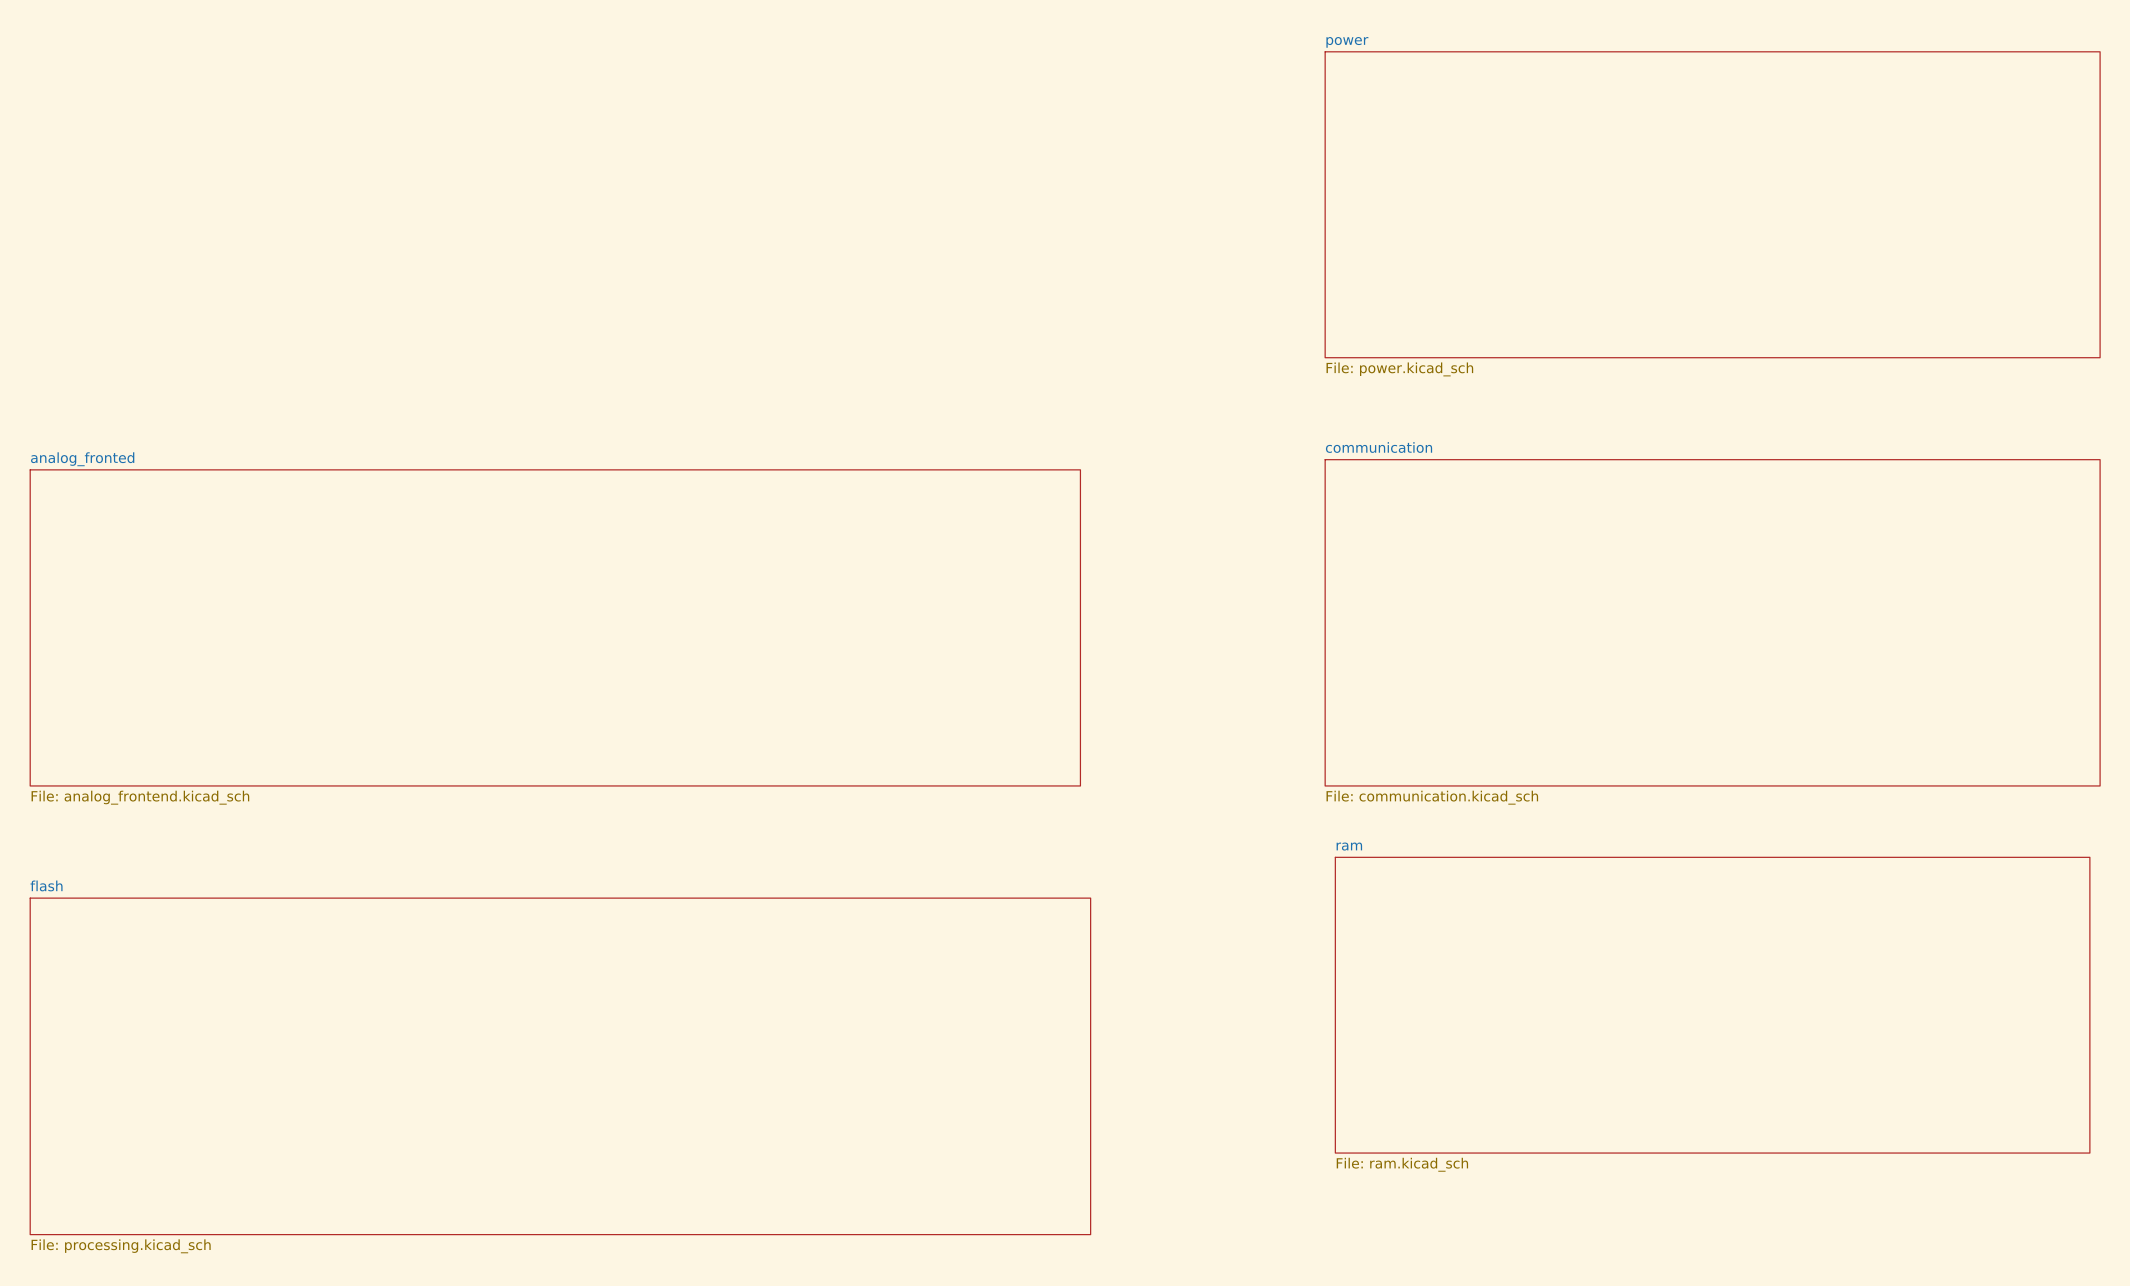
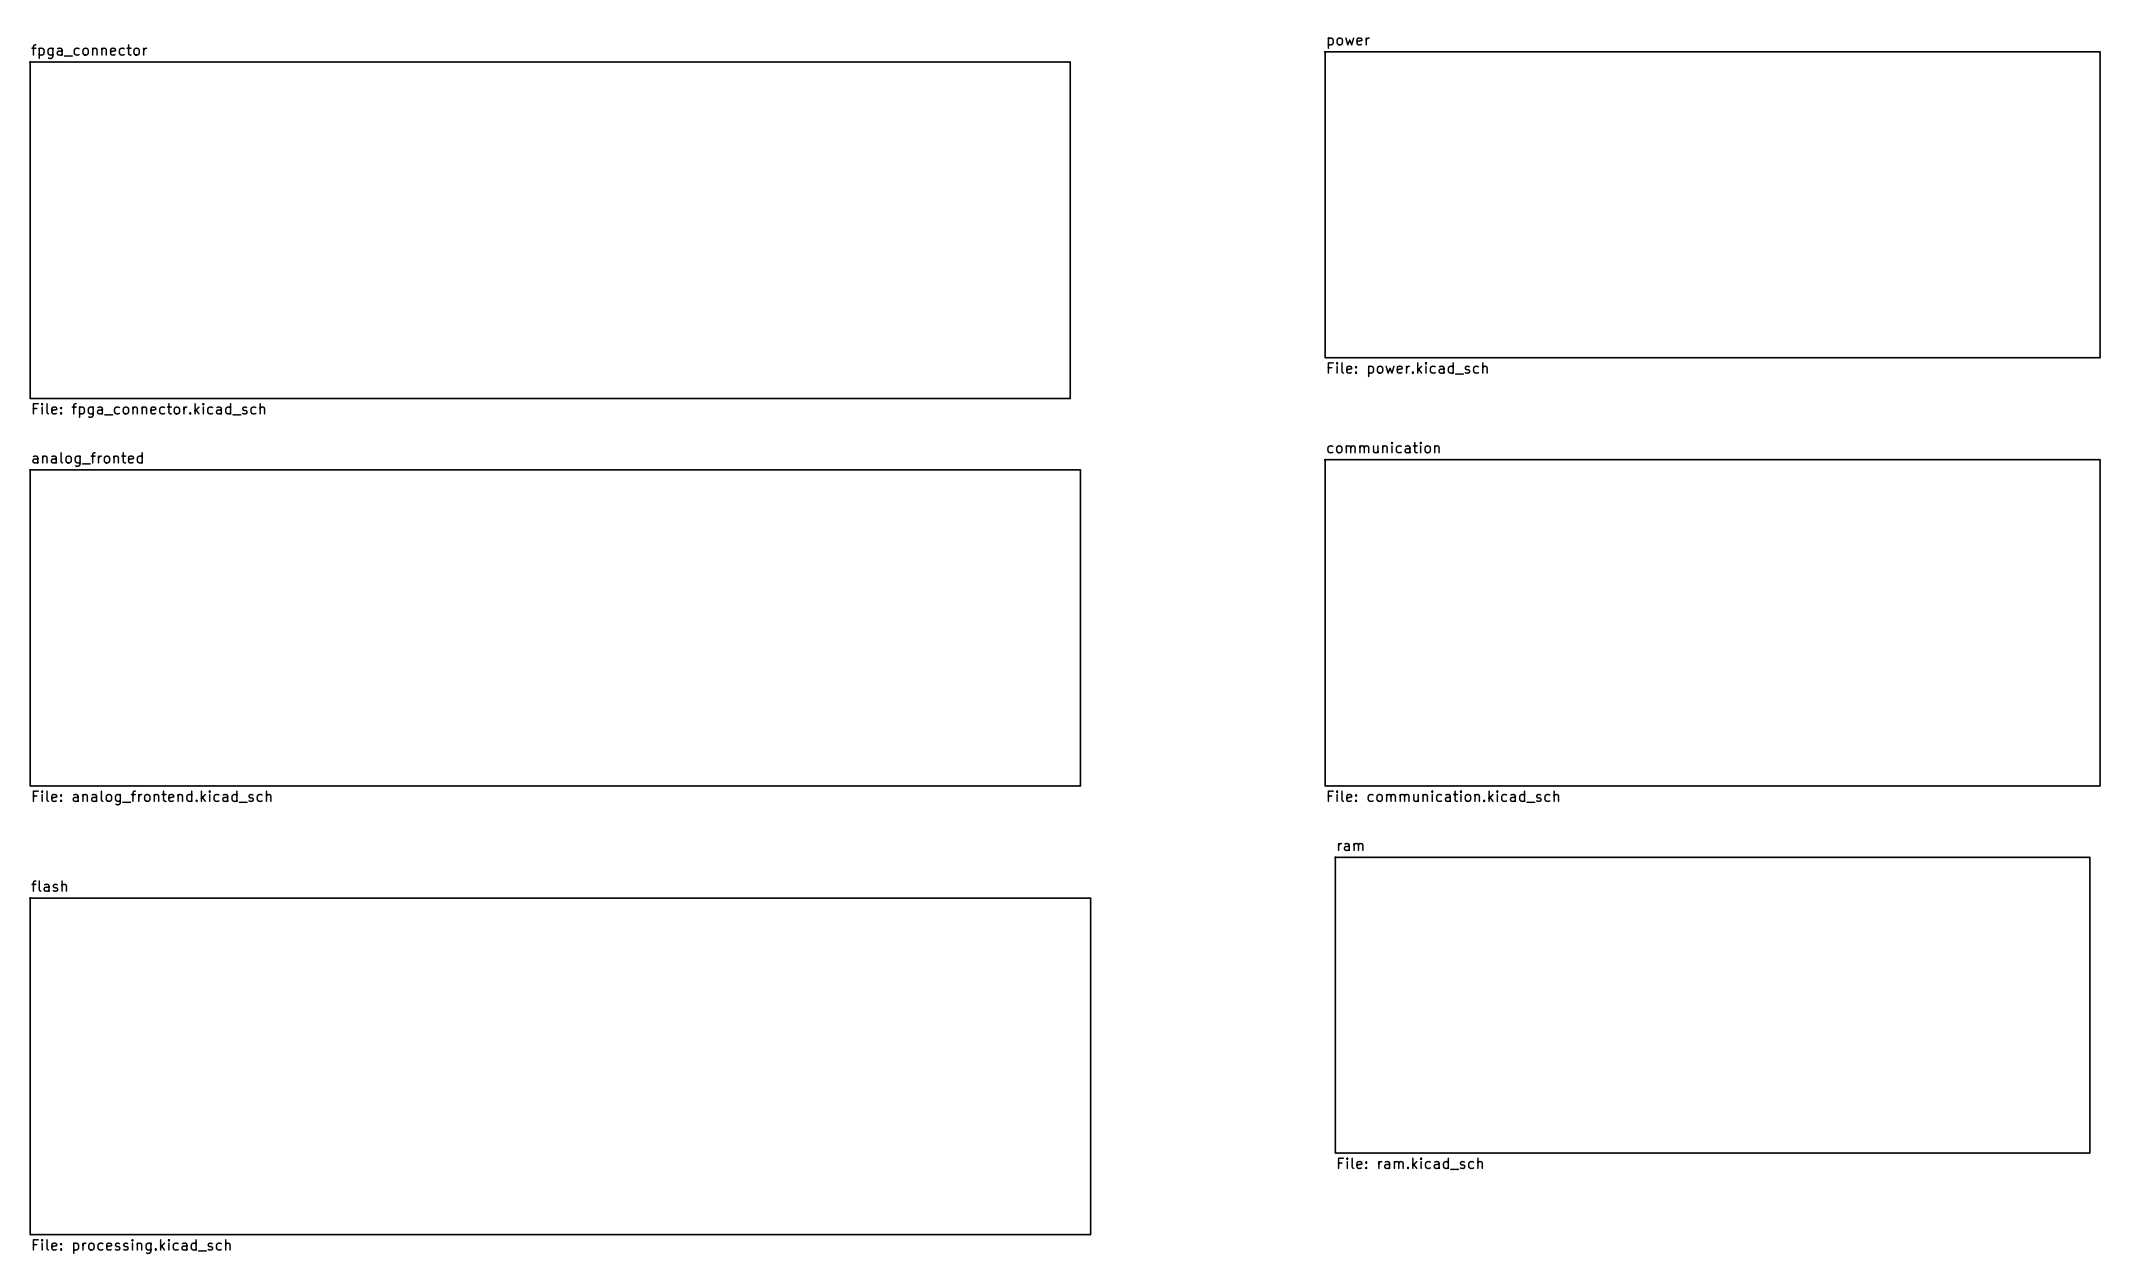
sheet fpga_connector: none -> File: fpga_connector.kicad_sch (550, 230)

